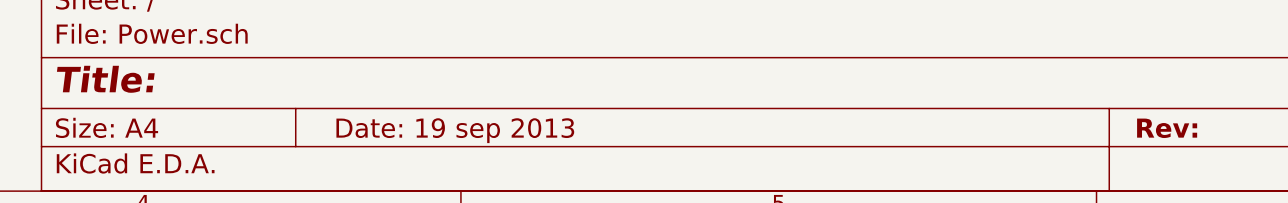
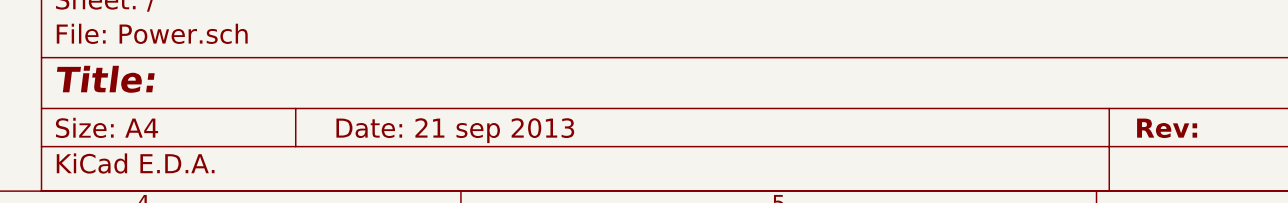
title block: Date: 19 sep 2013 (455, 130) -> Date: 21 sep 2013 (455, 130)

